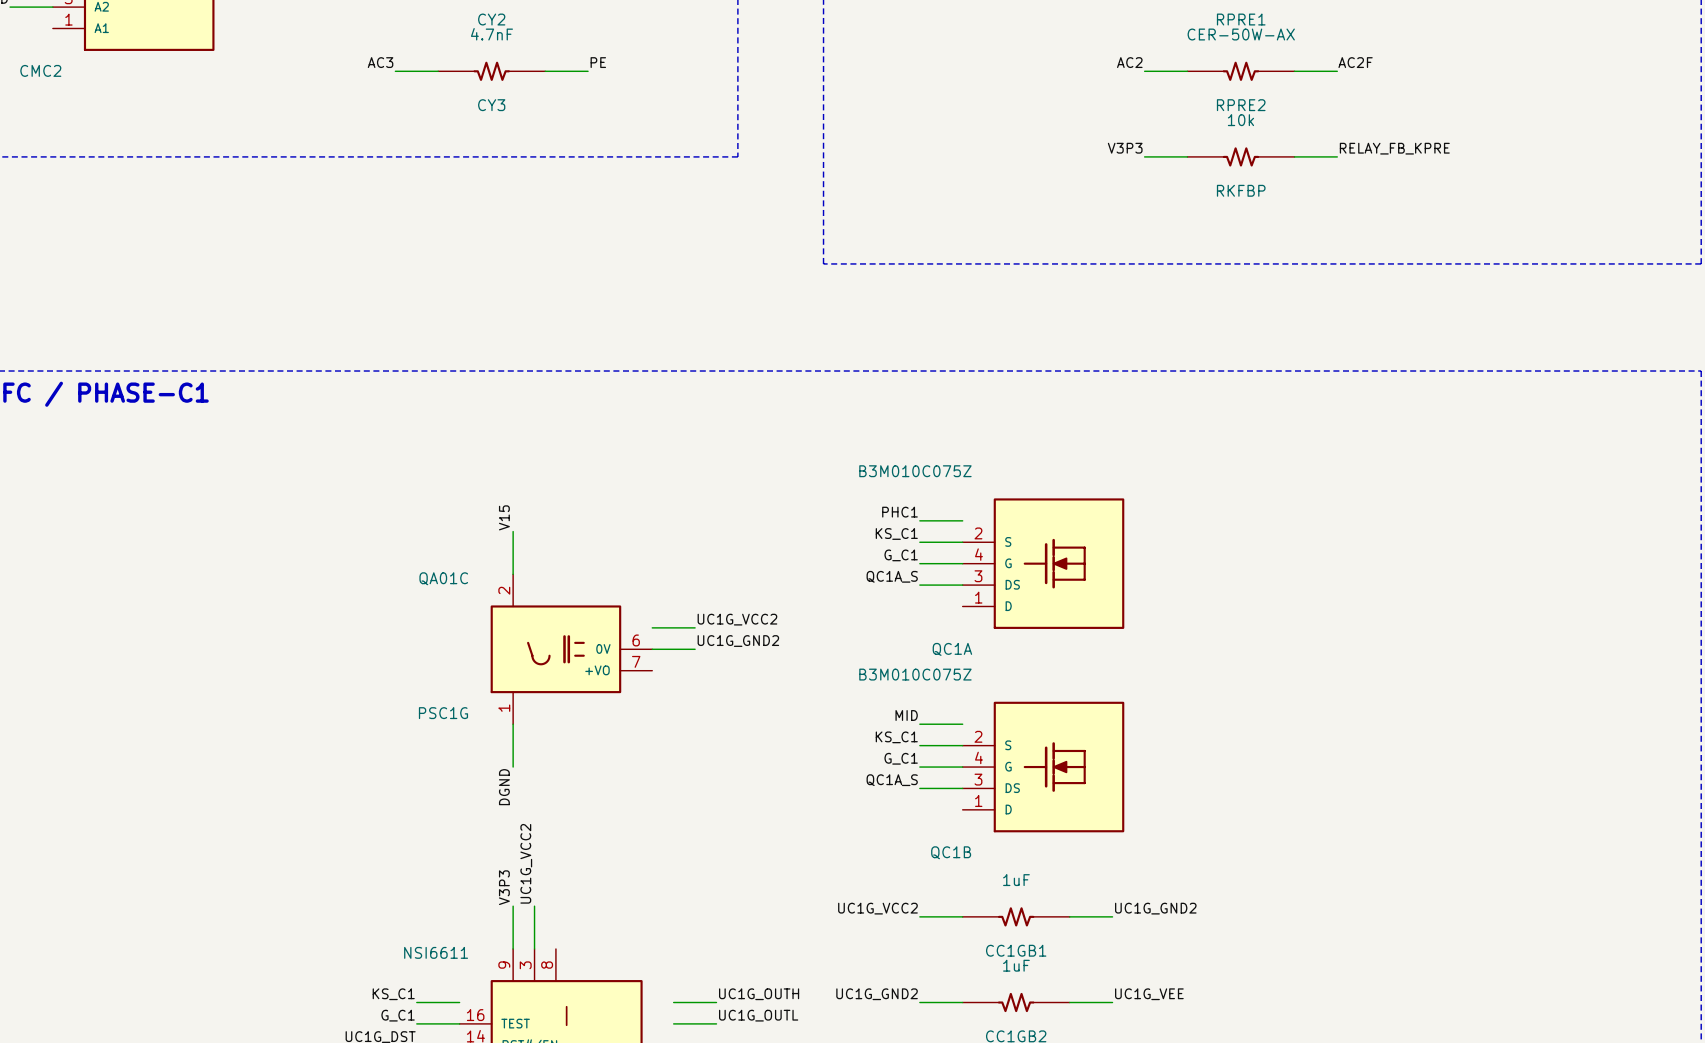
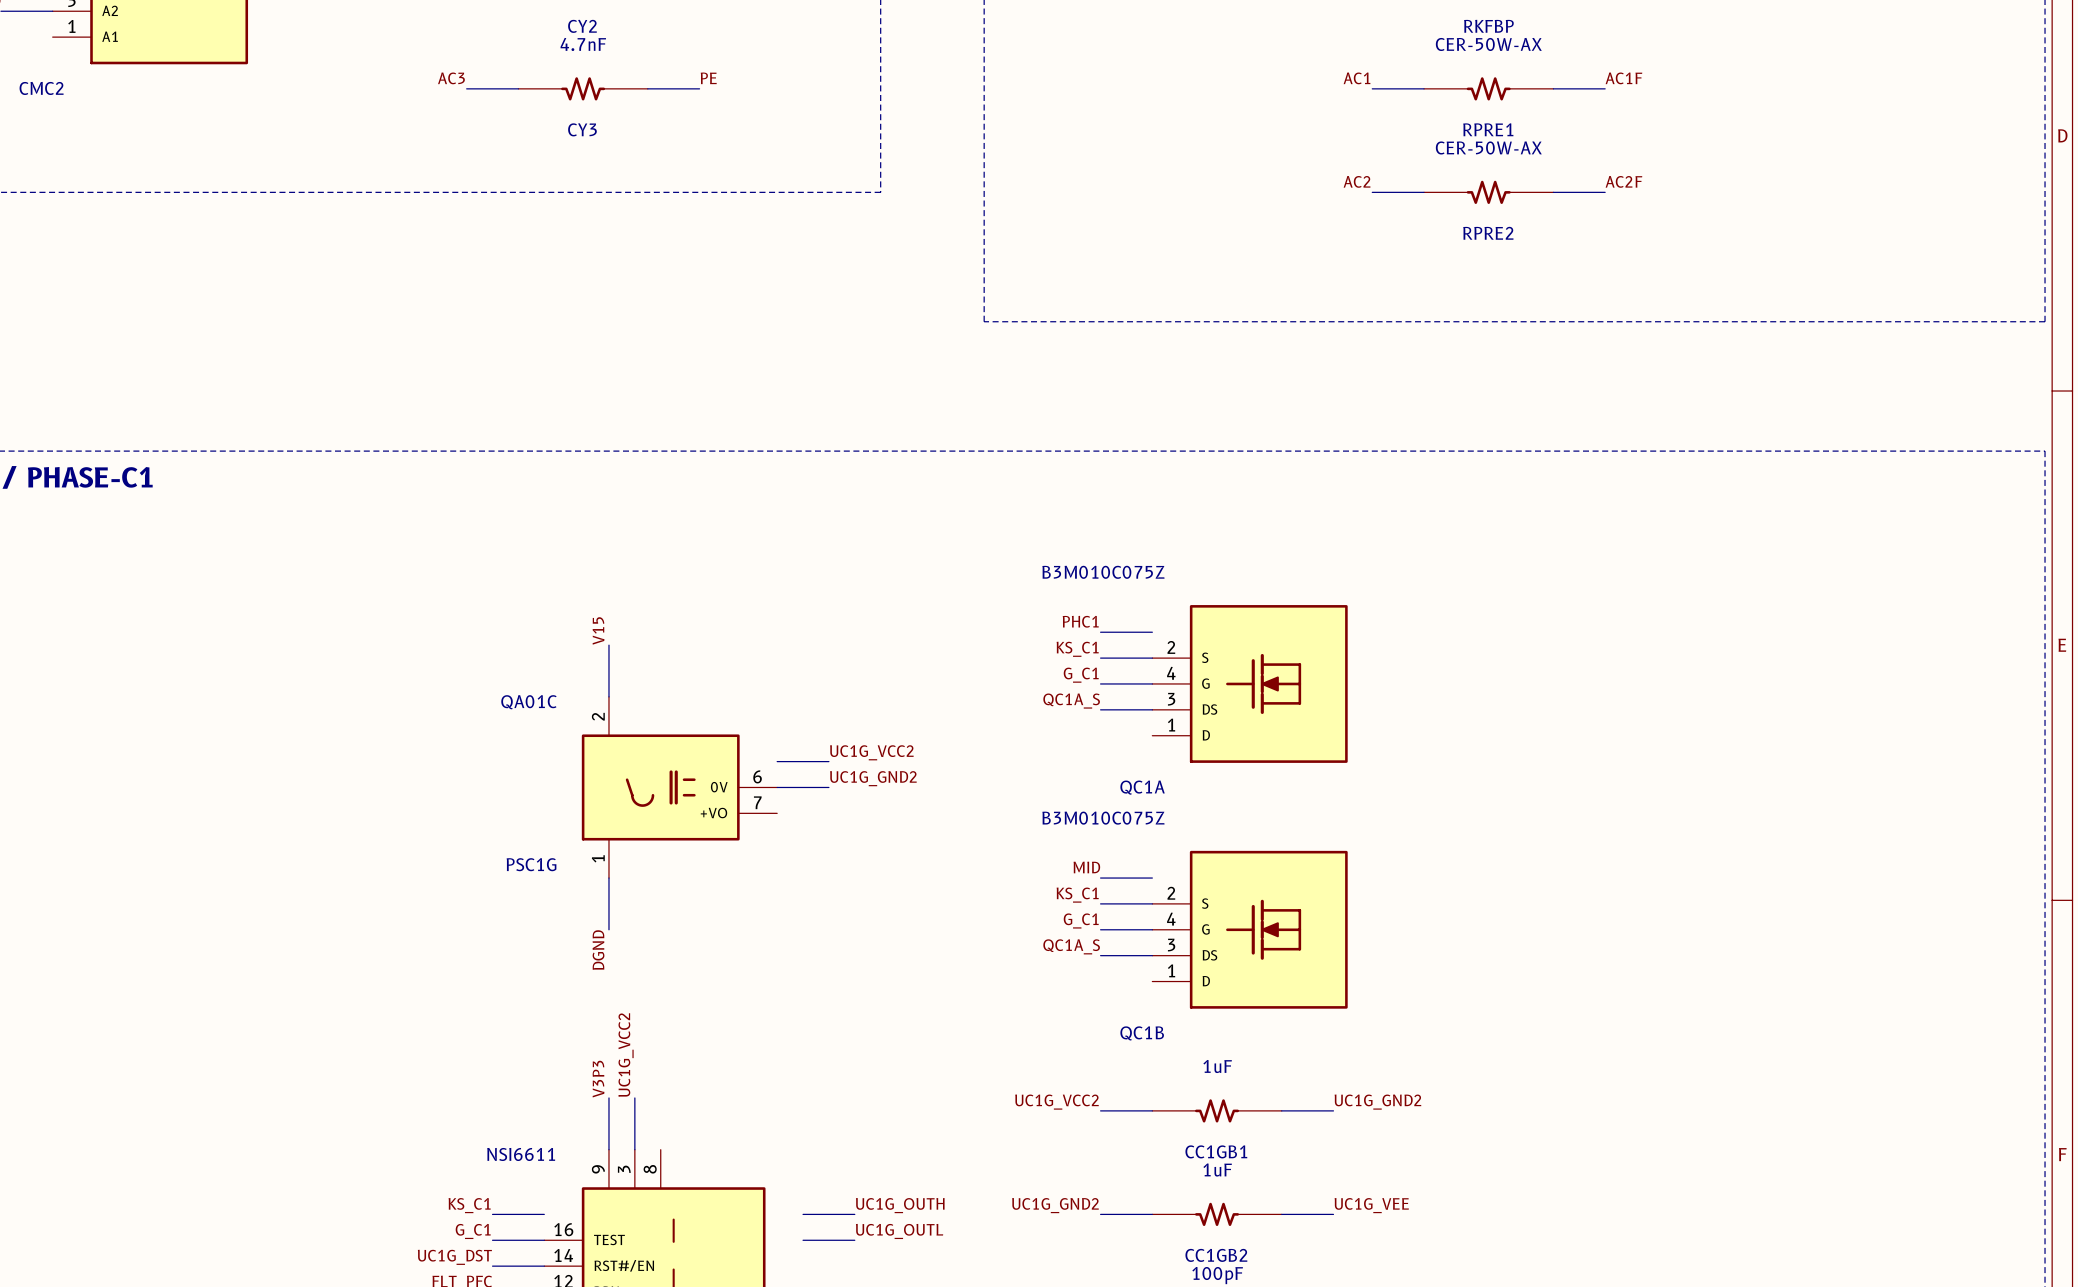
RPRE1 name: RPRE1 (1241, 19) -> RKFBP (1488, 26)
label: AC2 (1129, 62) -> AC1 (1357, 78)
label: AC2F (1355, 62) -> AC1F (1623, 78)
RPRE2 name: RPRE2 (1241, 105) -> RPRE1 (1488, 129)
RKFBP value: 10k (1240, 120) -> CER-50W-AX (1488, 147)
label: V3P3 (1125, 148) -> AC2 (1357, 181)
label: RELAY_FB_KPRE (1394, 148) -> AC2F (1623, 181)
RKFBP name: RKFBP (1241, 190) -> RPRE2 (1488, 233)

